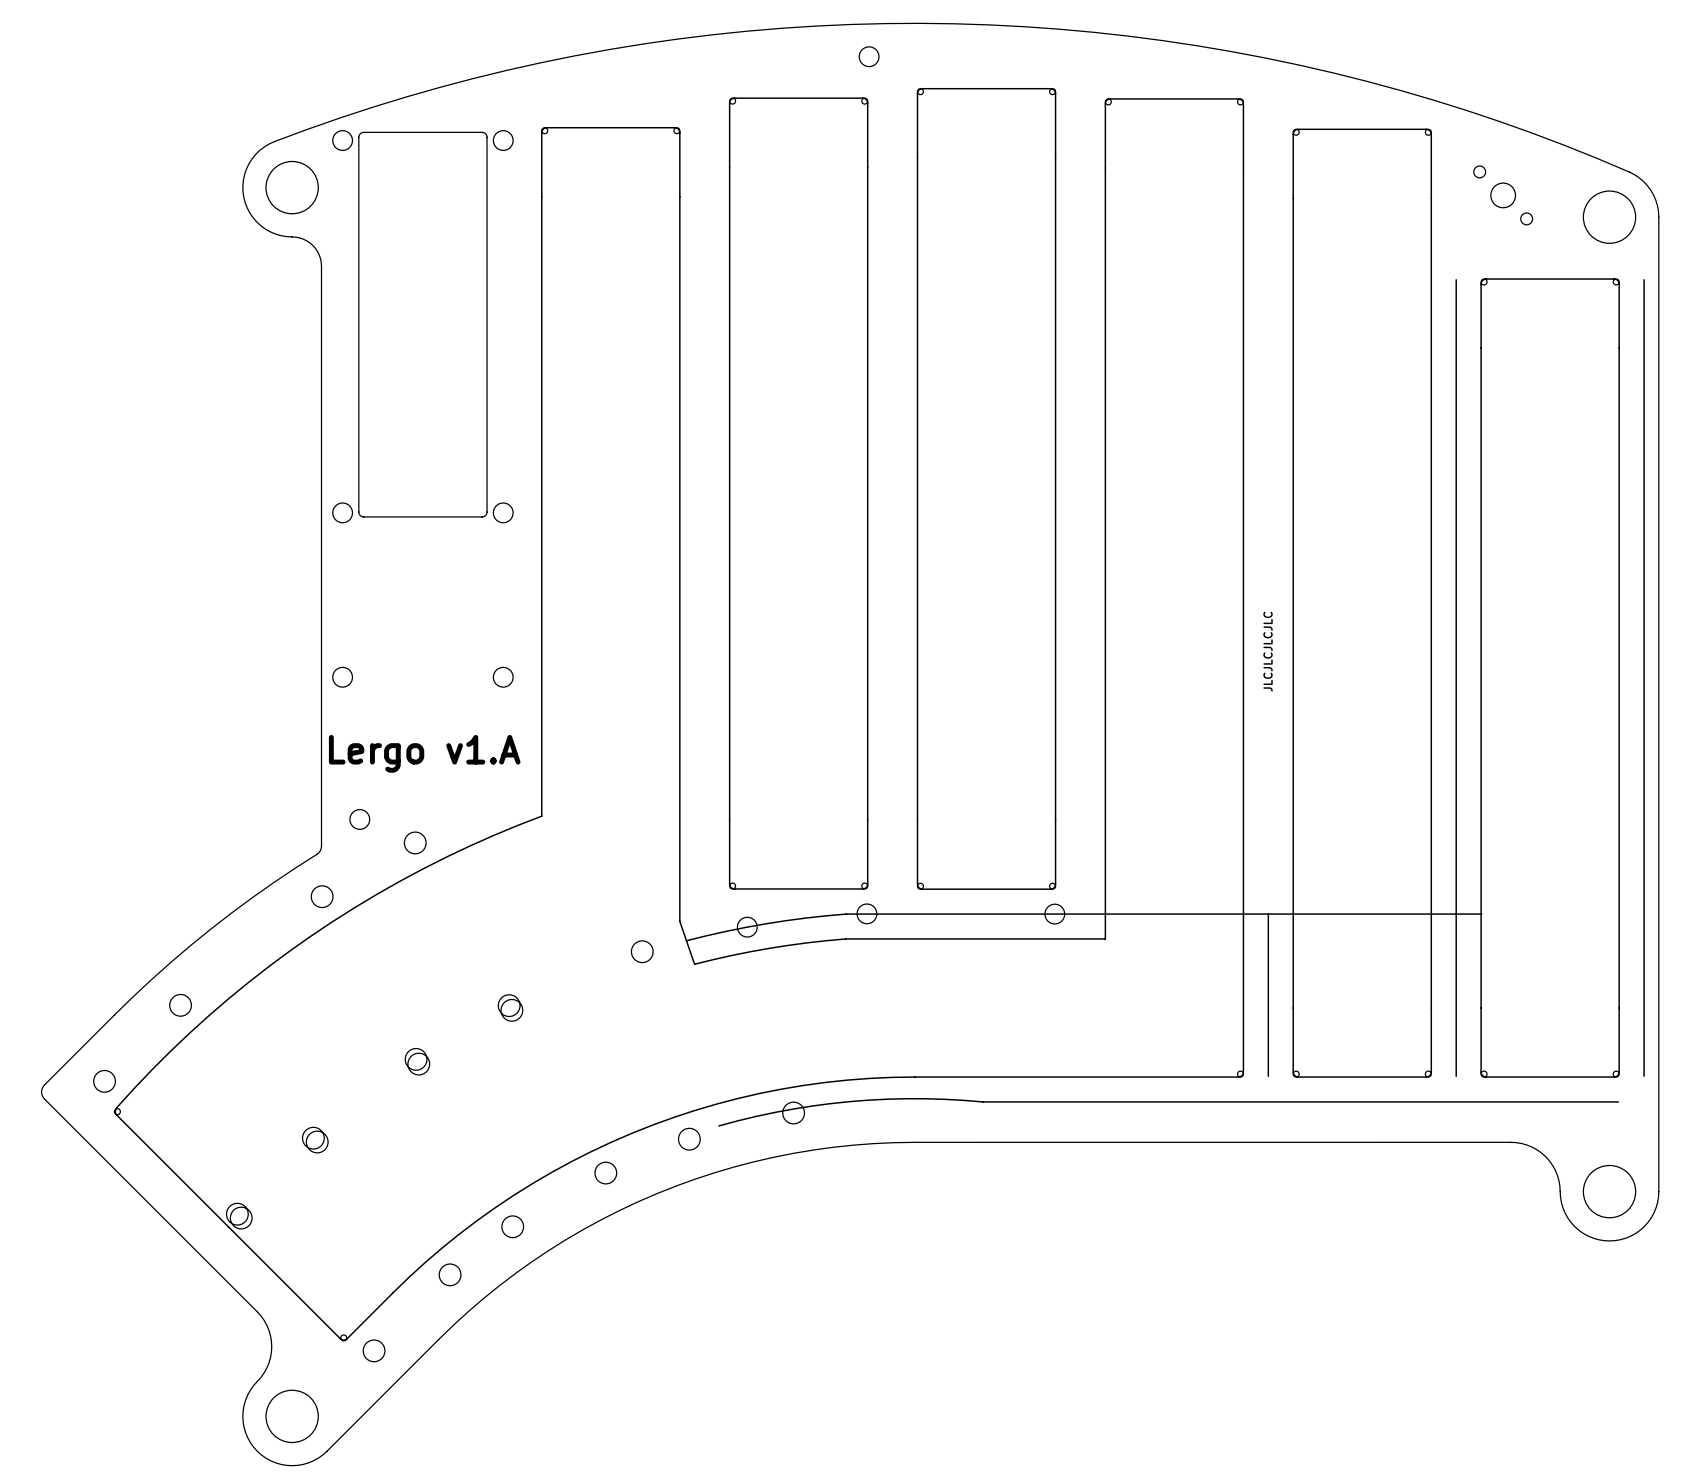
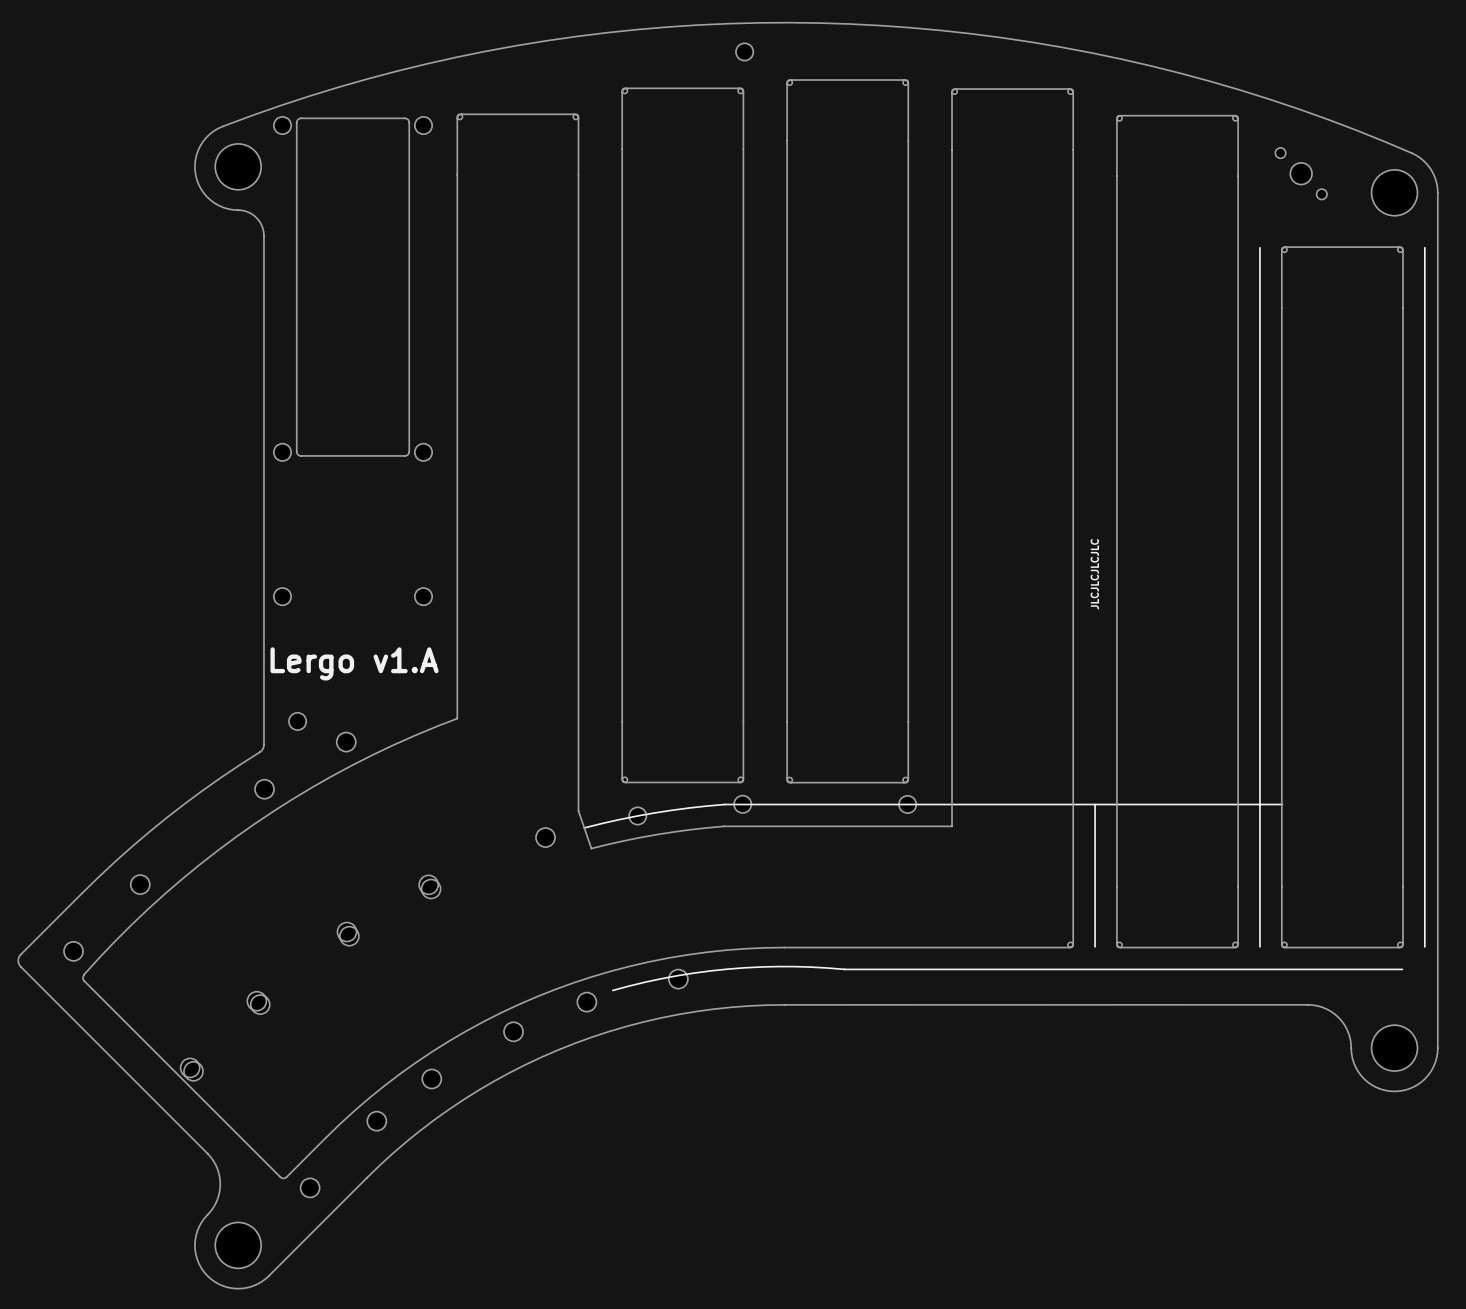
board edge: none -> (84, 974) (84, 980) (280, 1177) (286, 1177) (326, 1137)
part: (253, 1224) -> none

